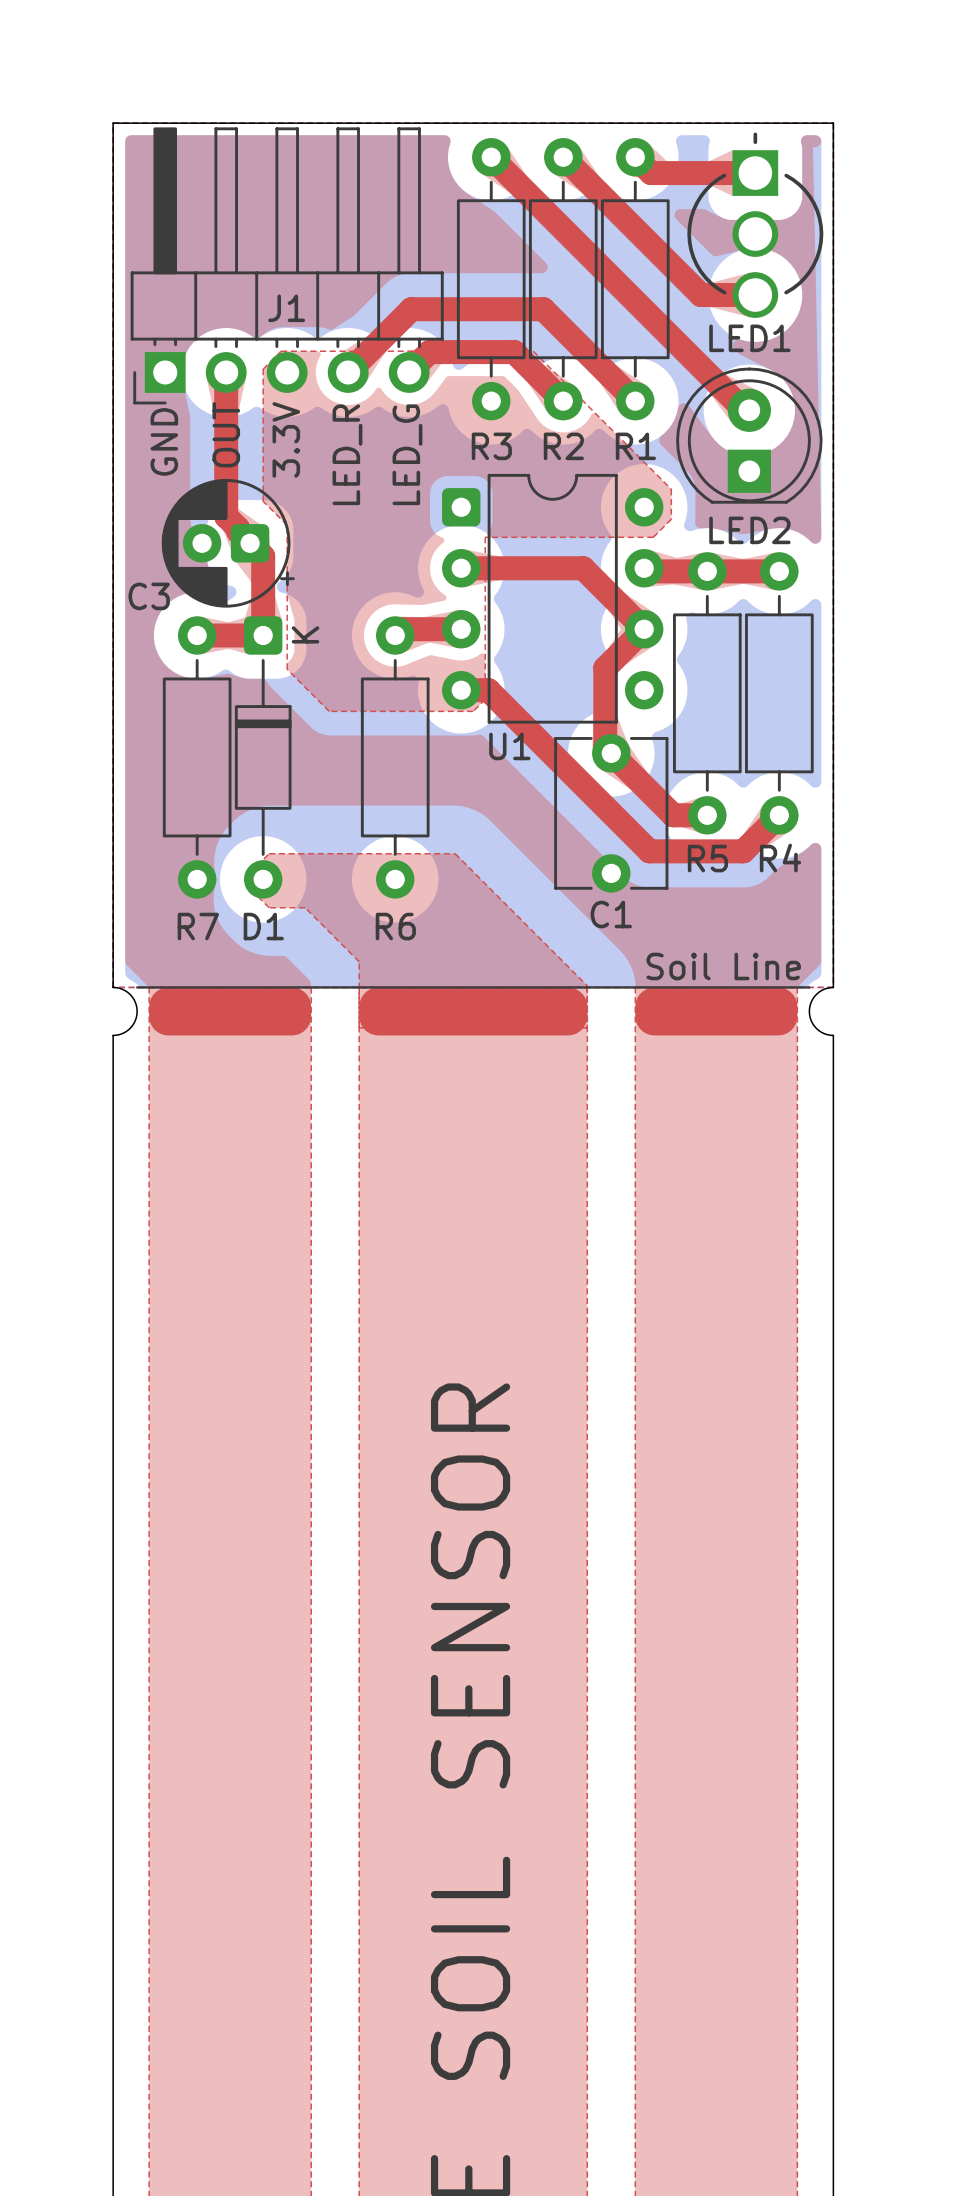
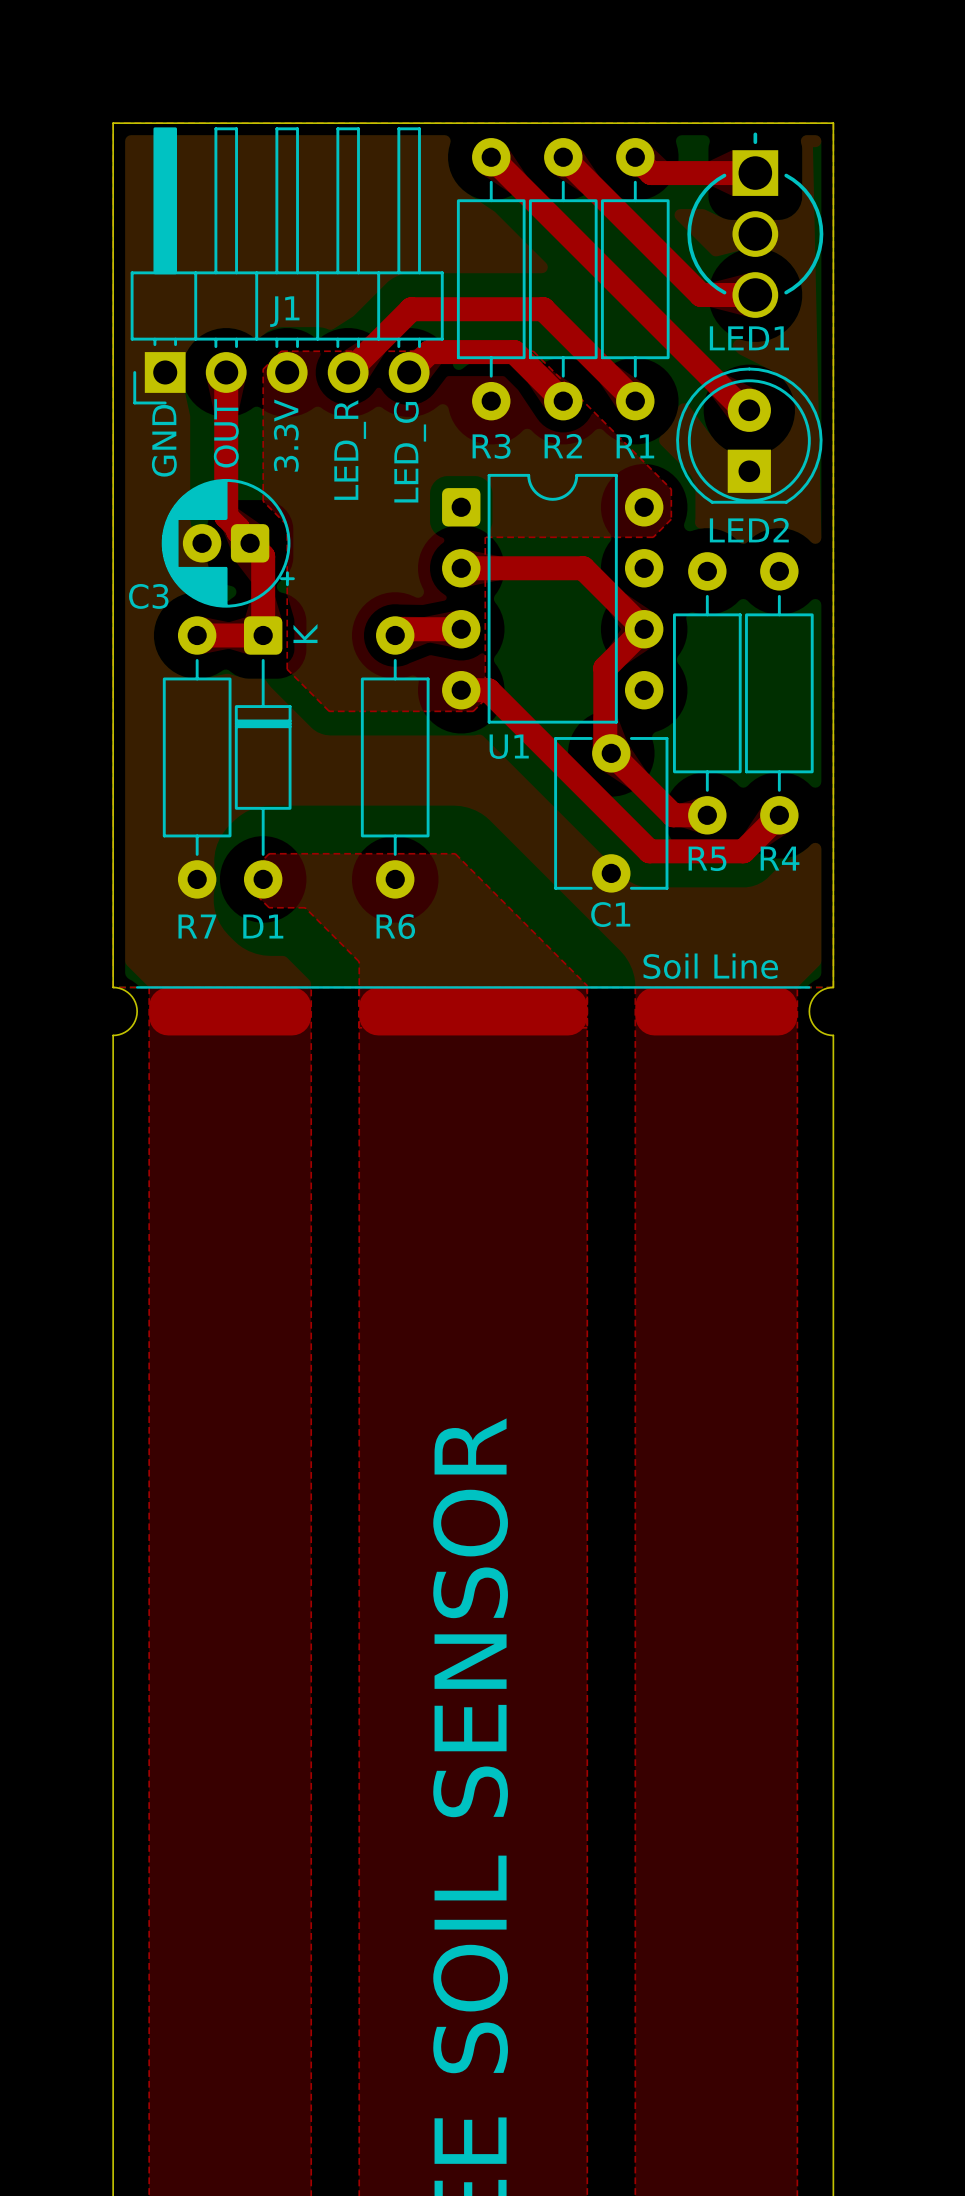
top track: (644, 568) (647, 571) (779, 571) -> none

